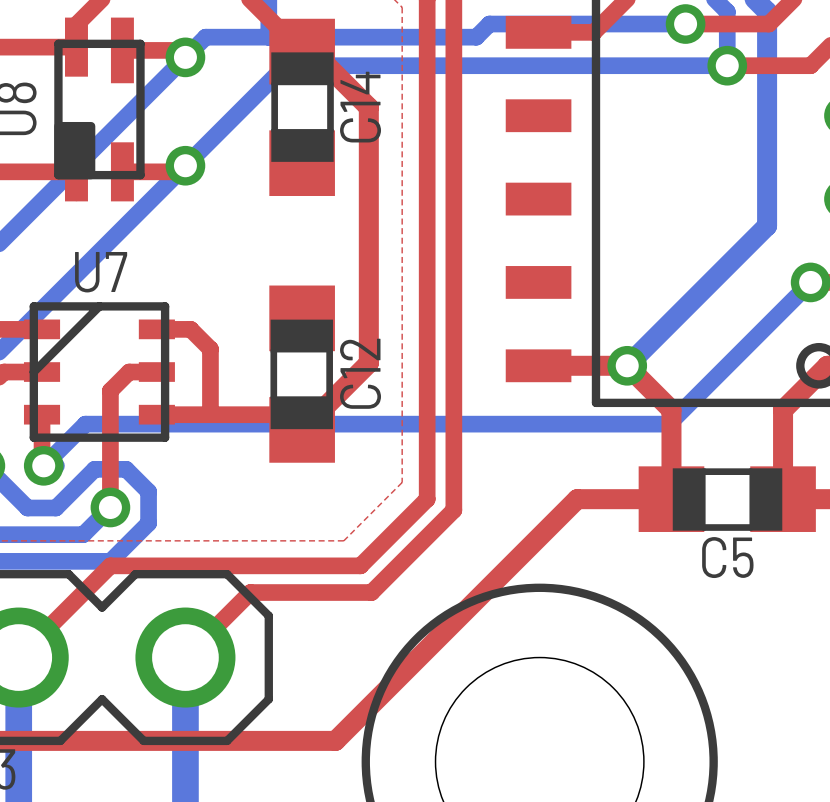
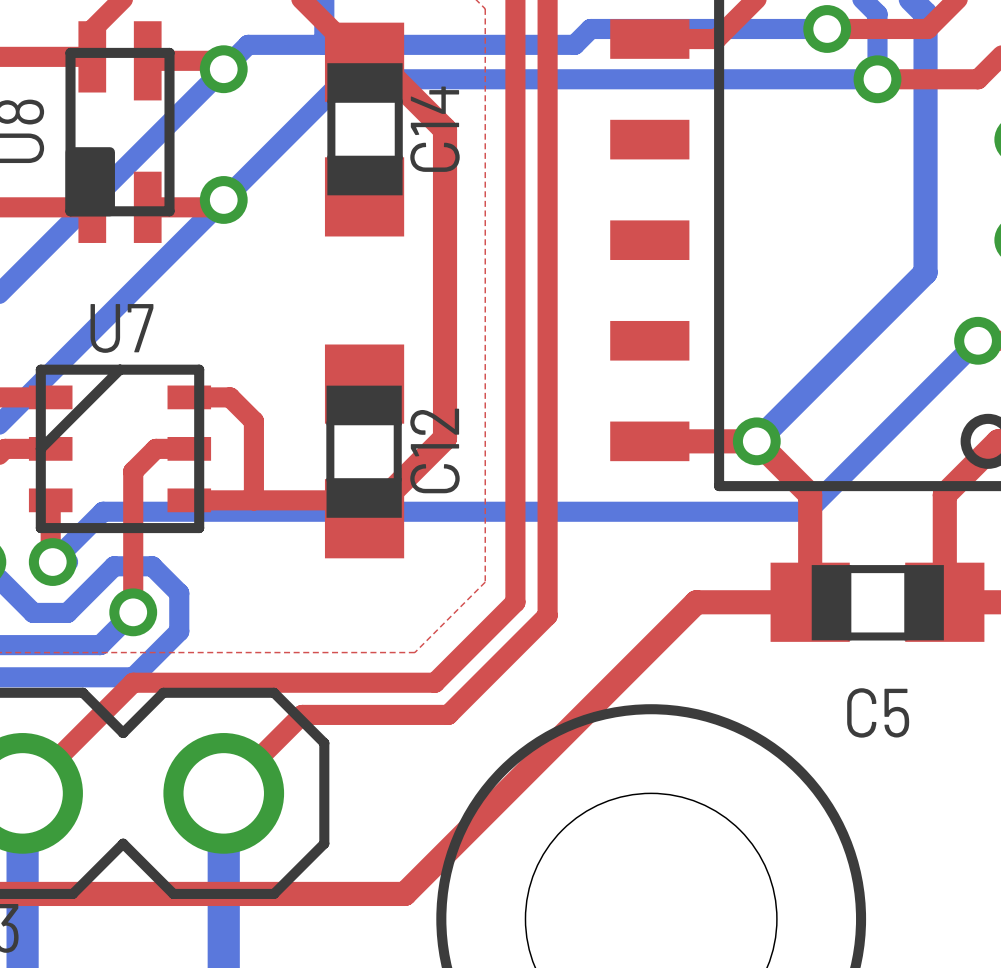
C5 name position: C5 (727, 557) -> C5 (878, 712)

